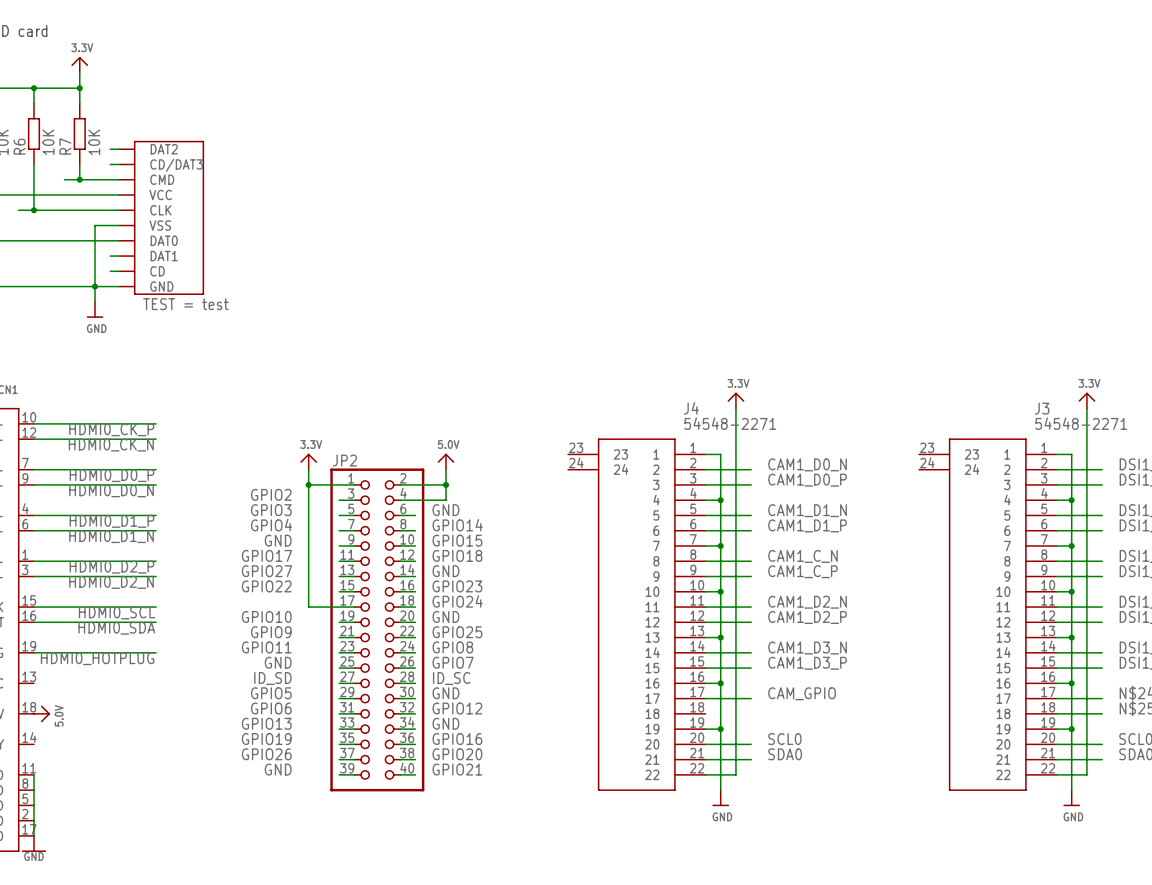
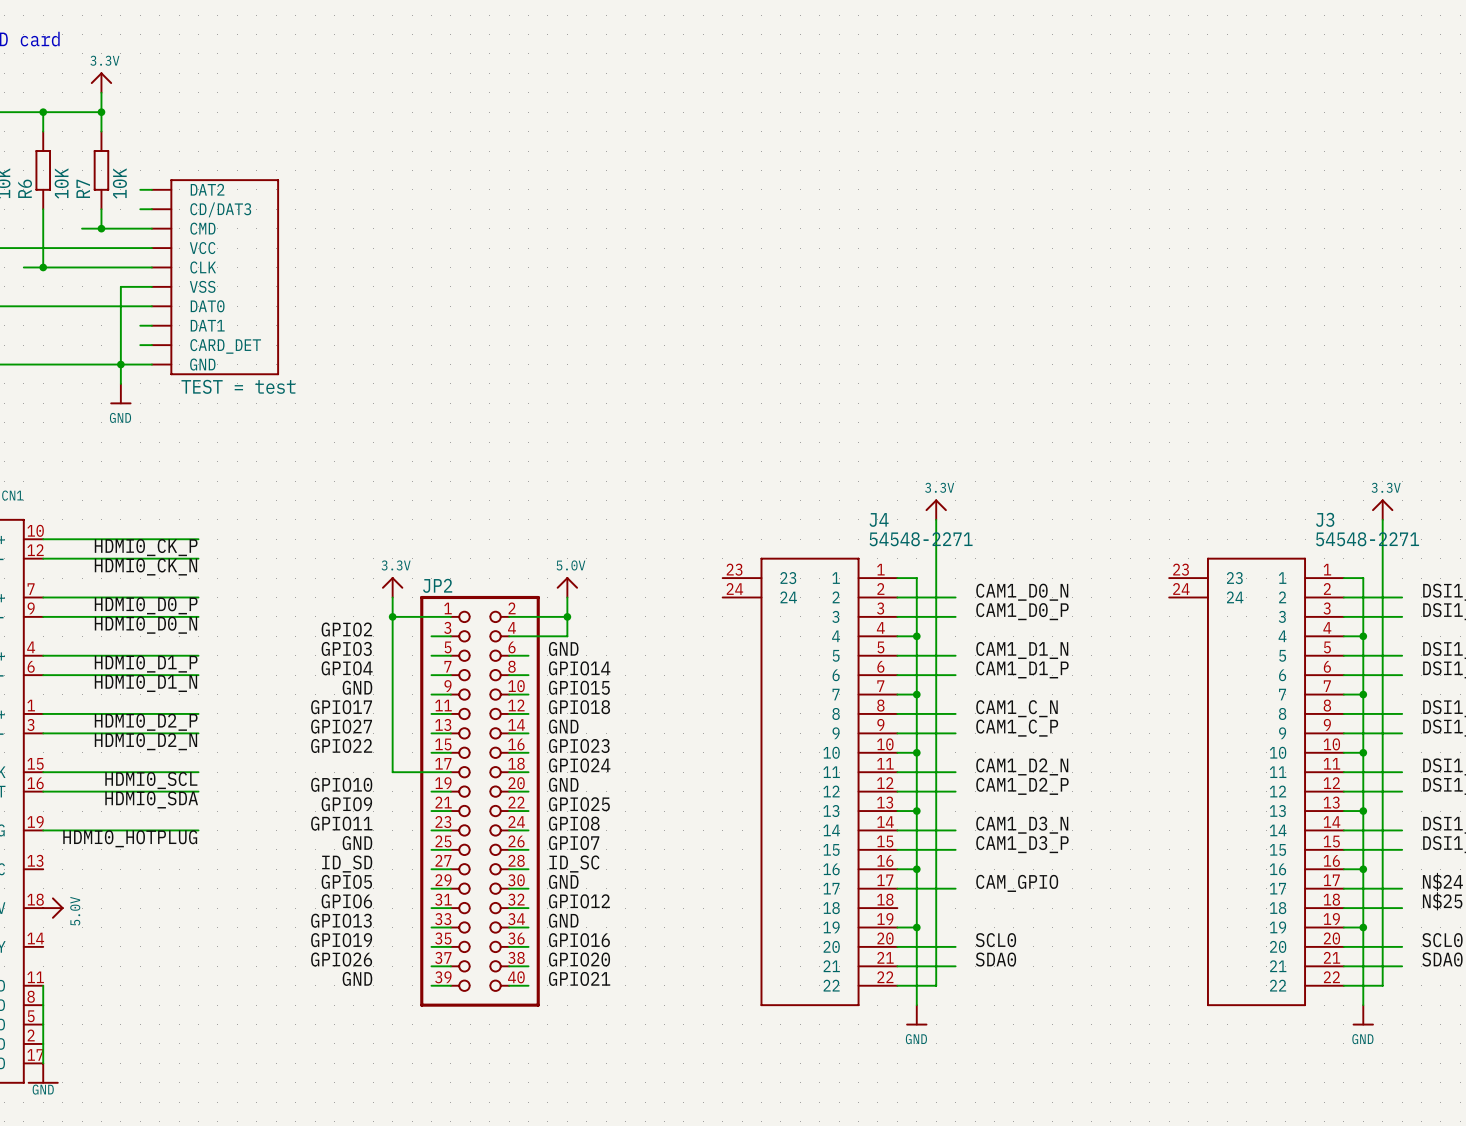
part: (161, 217) -> none
part: none -> (215, 277)

